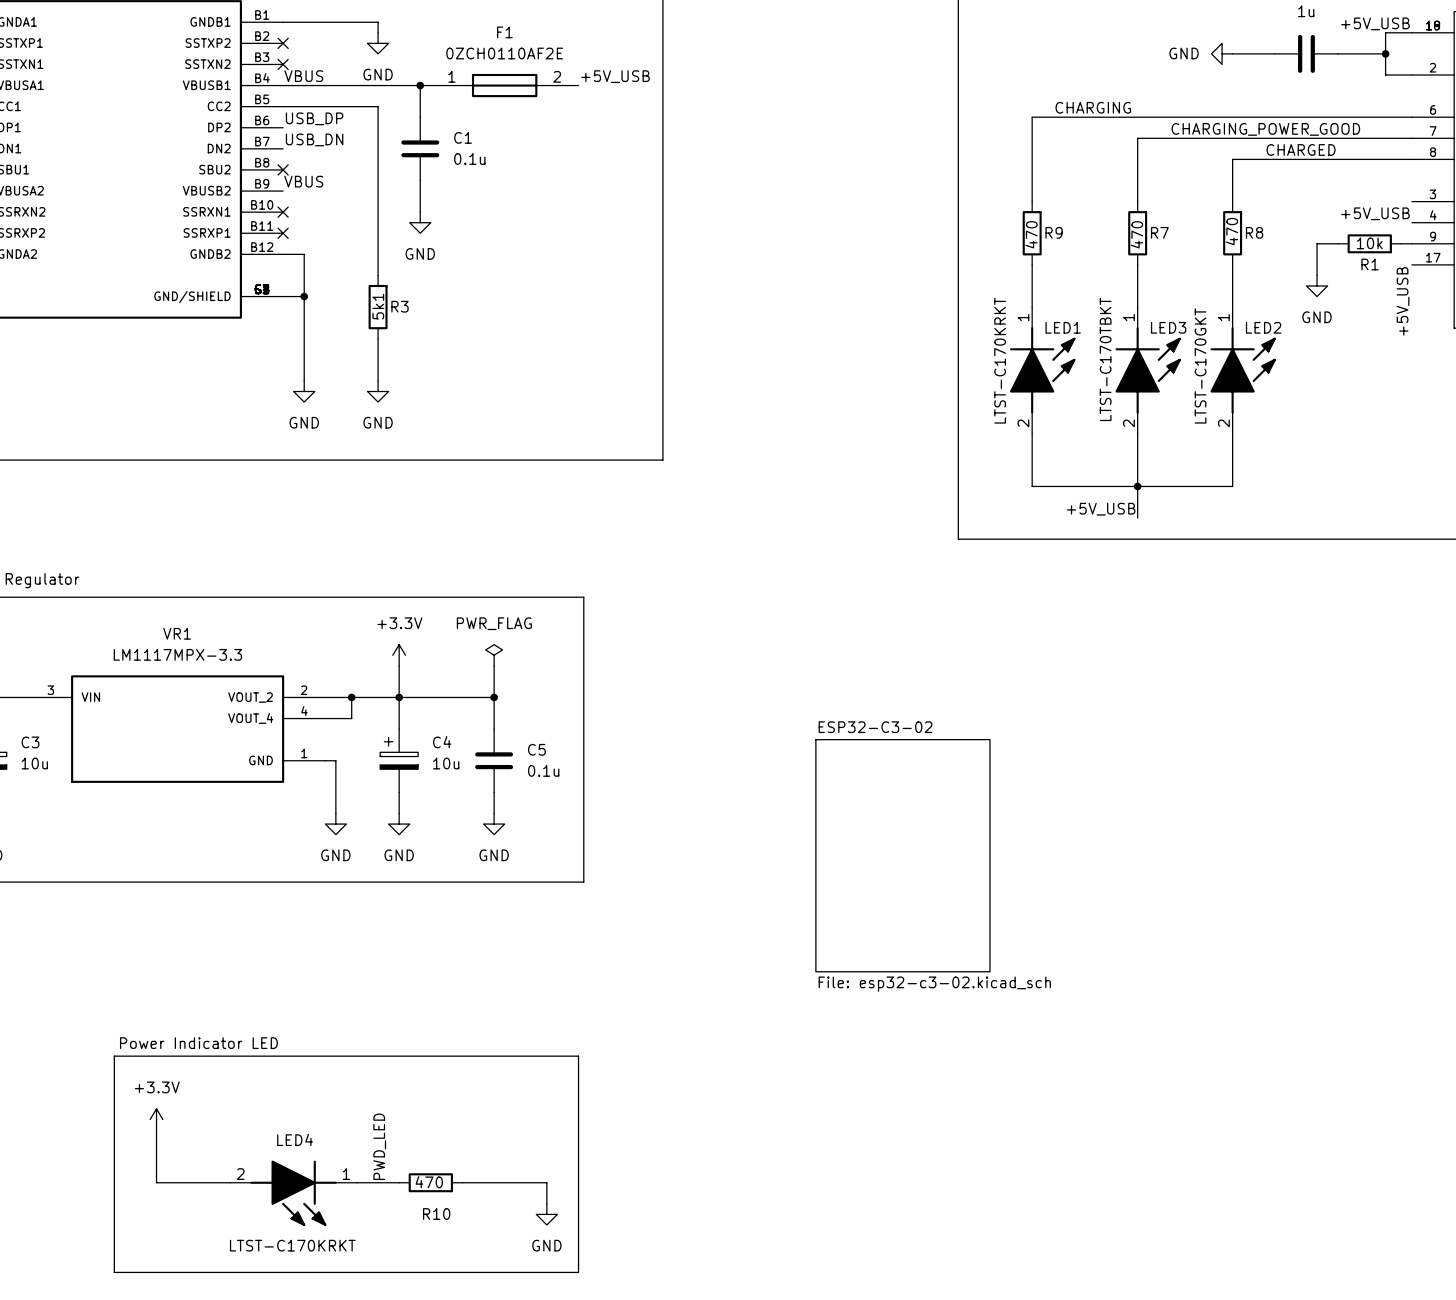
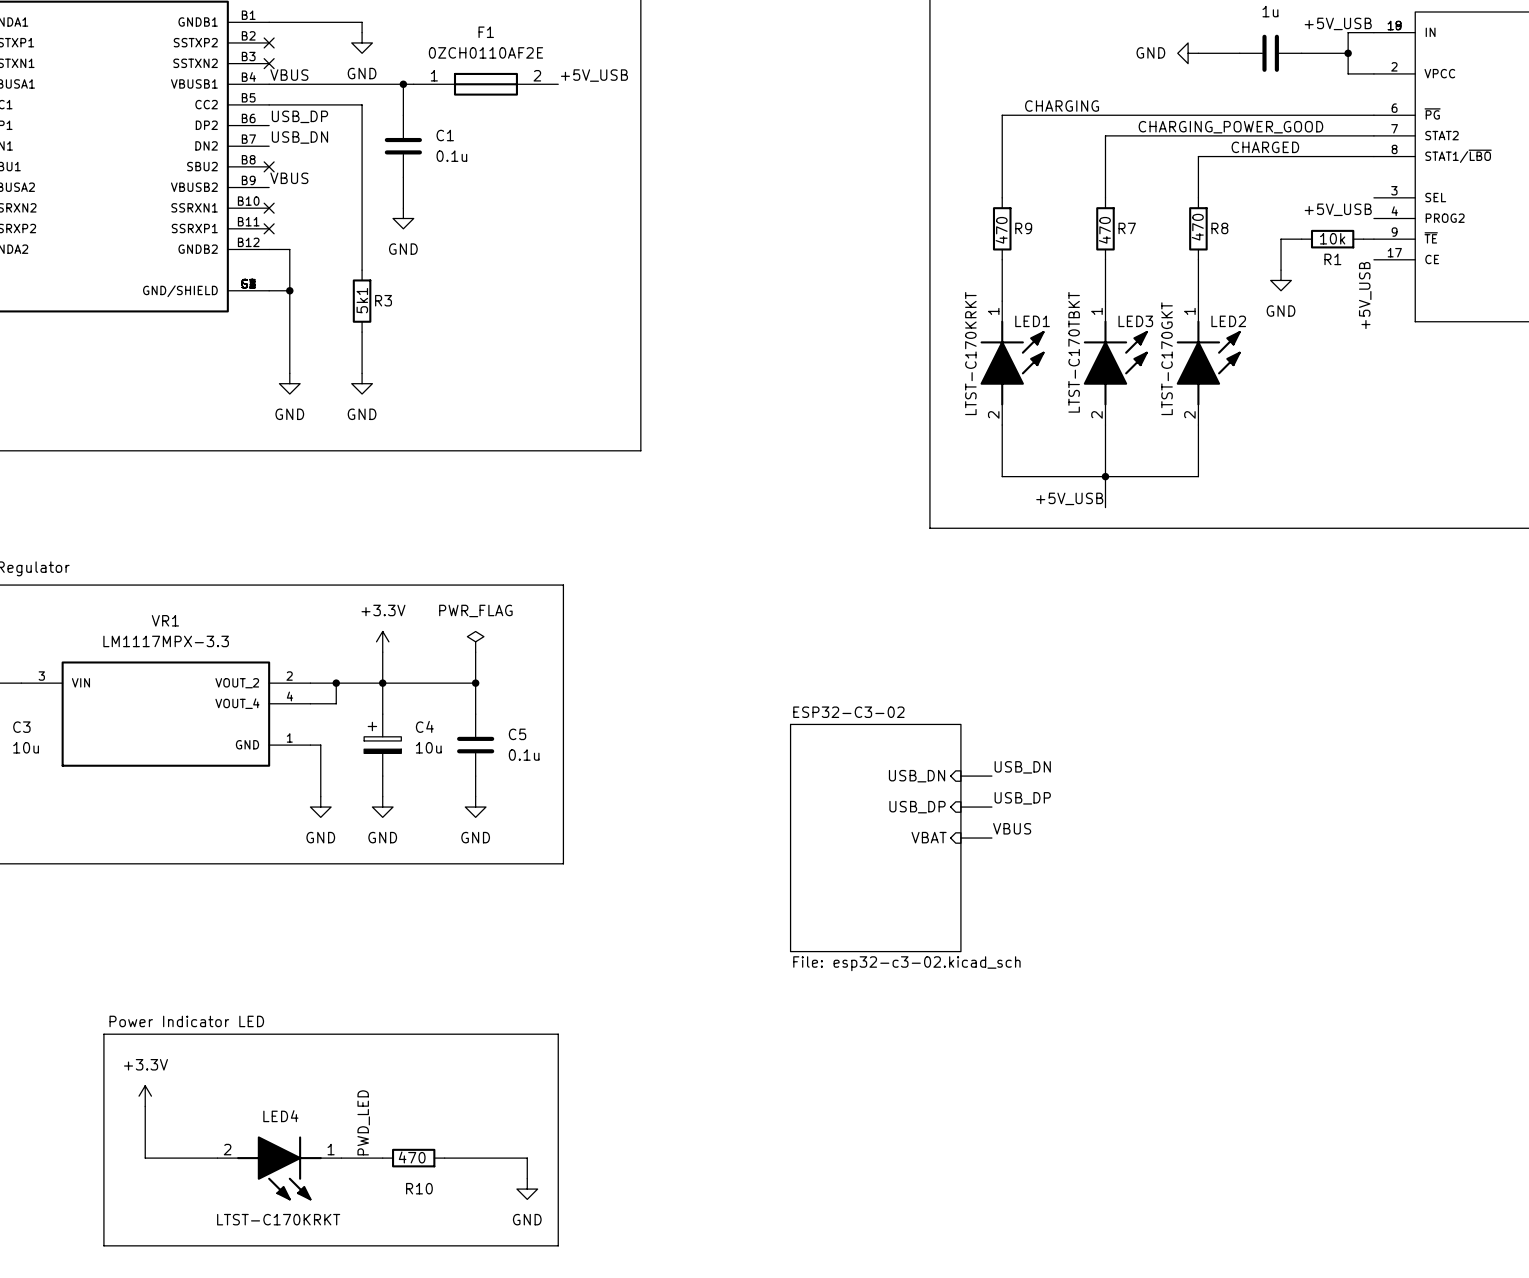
label: none -> USB_DN (1022, 767)
sheet pin: none -> USB_DN (917, 776)
wire: none -> (960, 776) (991, 776)
label: none -> USB_DP (1022, 798)
sheet pin: none -> USB_DP (917, 807)
wire: none -> (960, 807) (991, 807)
label: none -> VBUS (1012, 828)
sheet pin: none -> VBAT (929, 837)
wire: none -> (960, 838) (991, 838)

